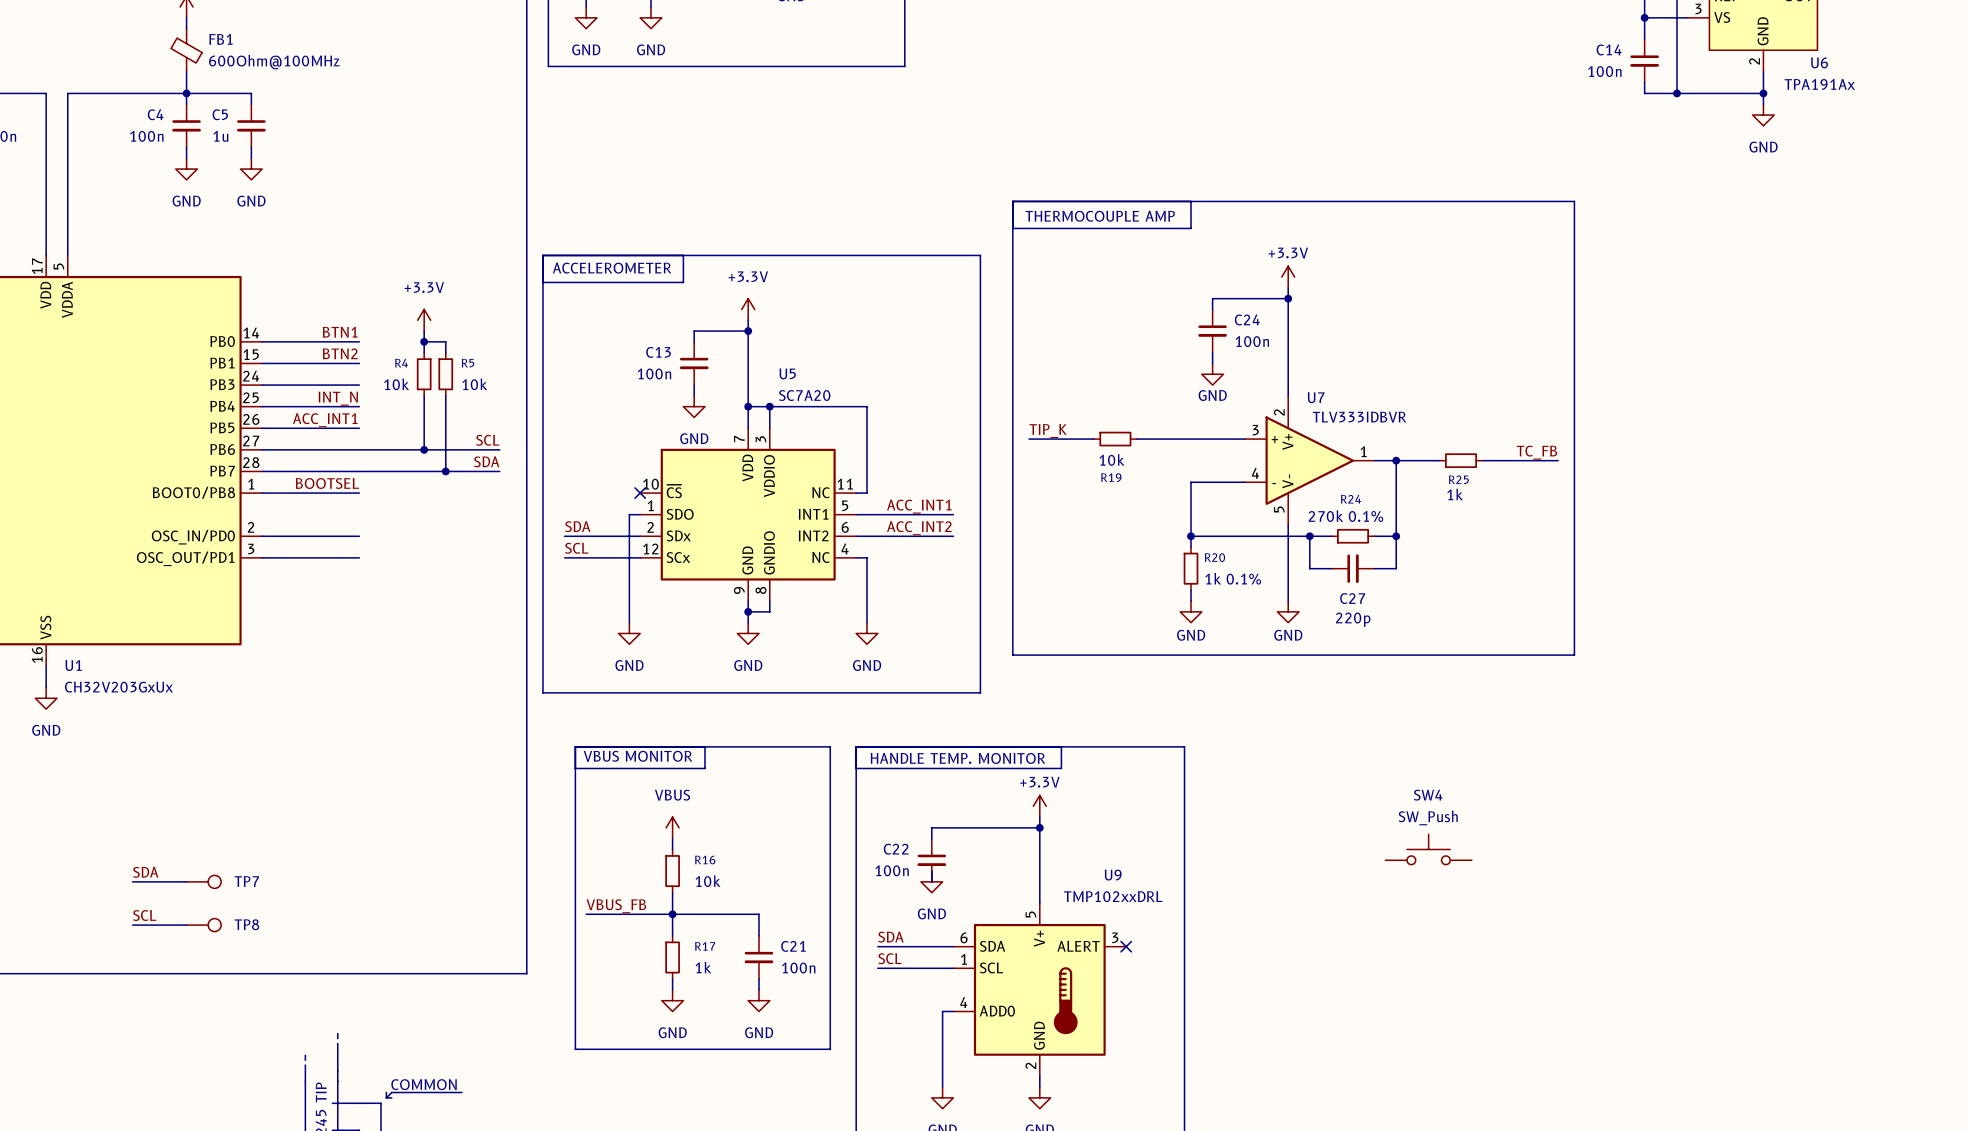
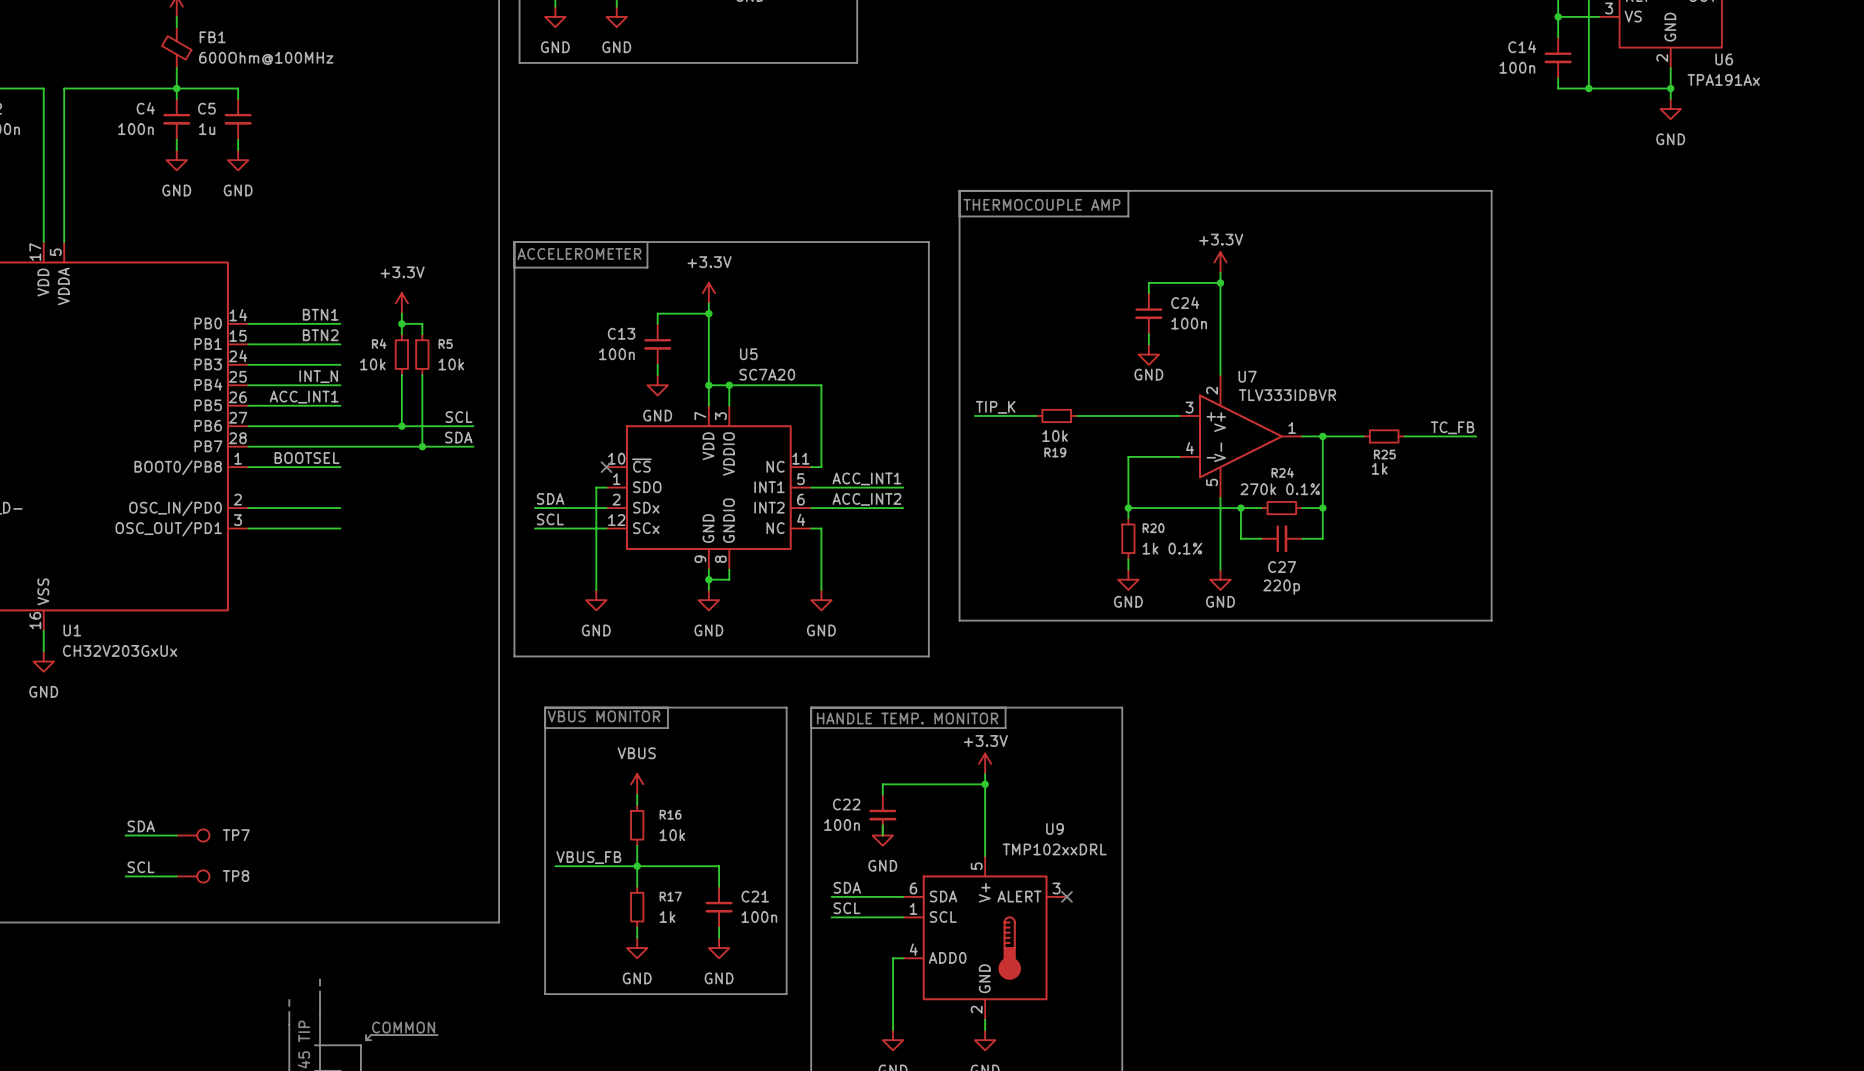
SW4: SW_Push (1428, 849) -> none

